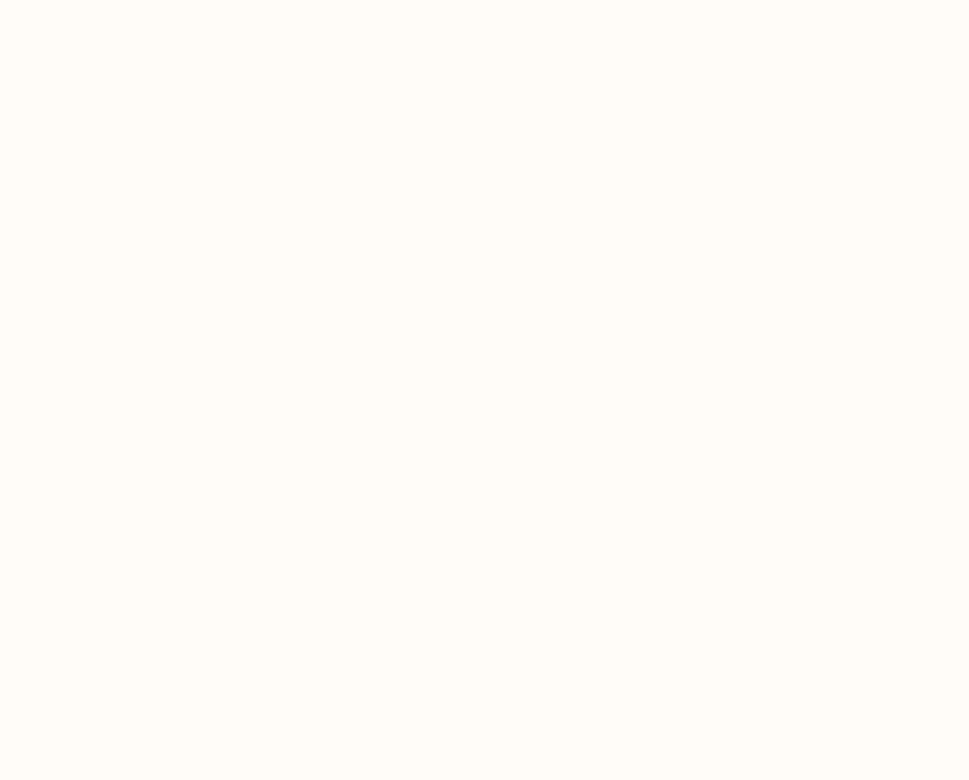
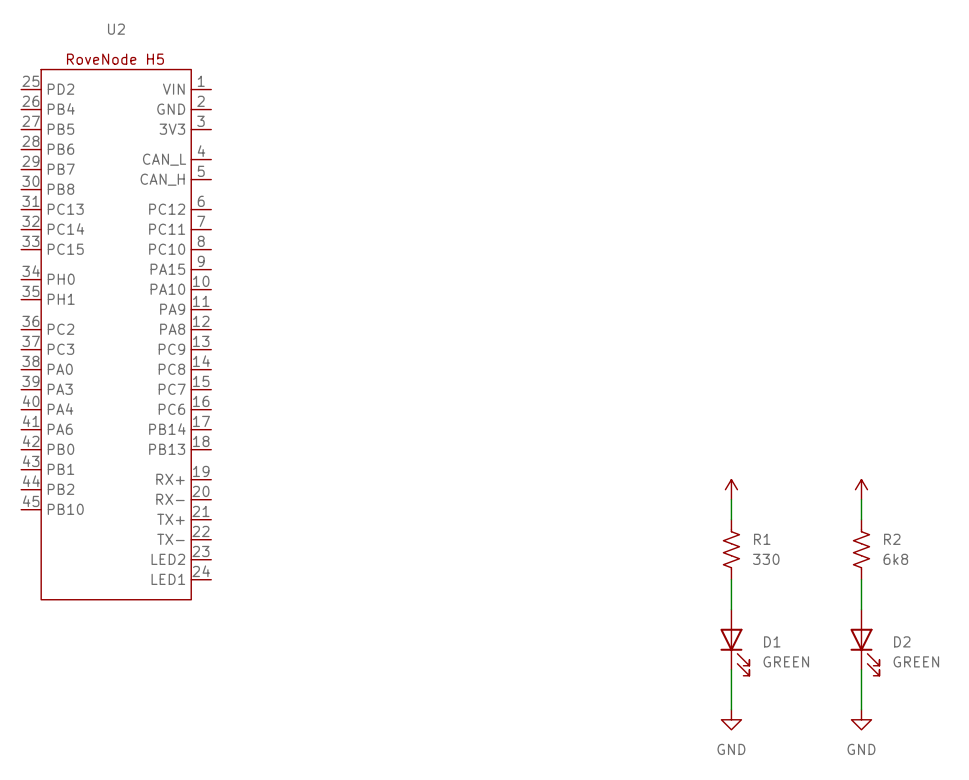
U2: none -> (116, 334)
power symbol: none -> (731, 489)
power symbol: none -> (861, 489)
wire: none -> (731, 499) (731, 519)
wire: none -> (861, 499) (861, 519)
R1: none -> 330 (731, 549)
R2: none -> 6k8 (861, 549)
wire: none -> (731, 579) (731, 609)
wire: none -> (861, 579) (861, 609)
D1: none -> GREEN (734, 642)
D2: none -> GREEN (864, 642)
wire: none -> (731, 669) (731, 709)
wire: none -> (861, 669) (861, 709)
power symbol: none -> GND (731, 719)
power symbol: none -> GND (861, 719)

